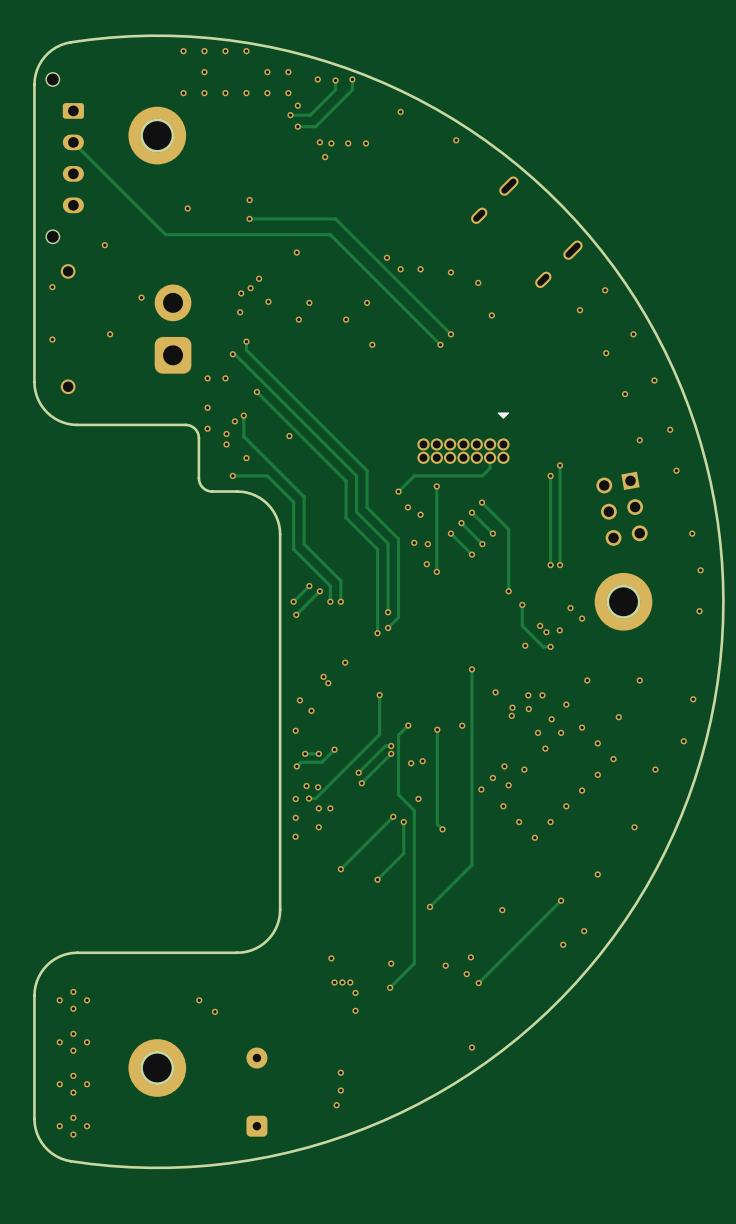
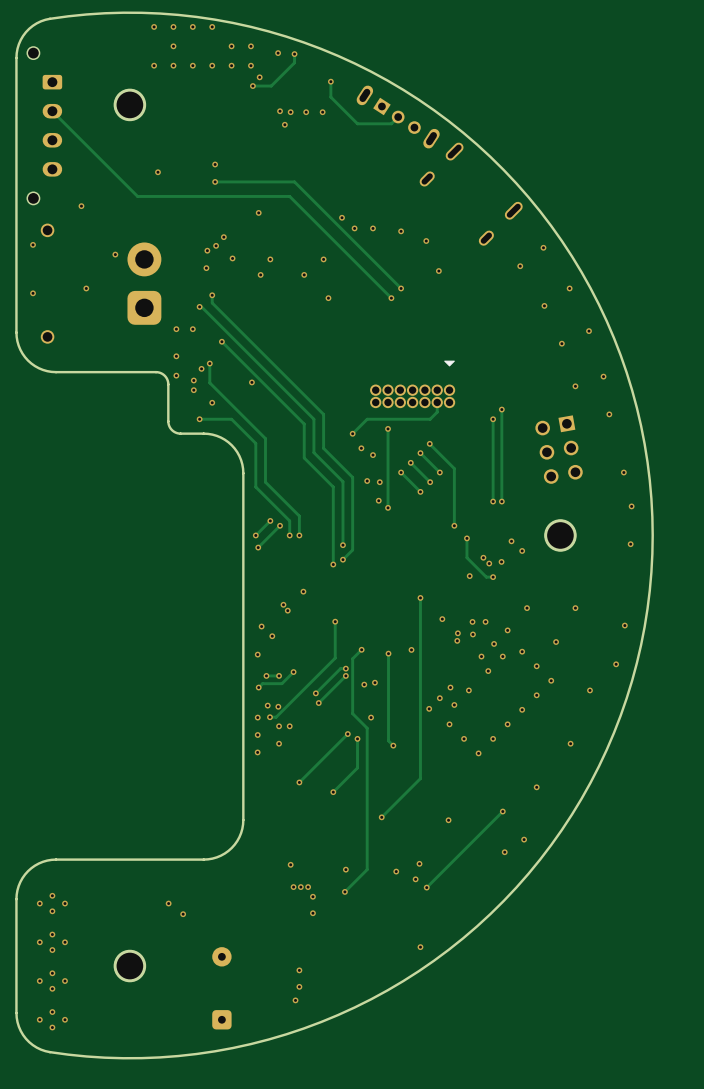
track: (352, 79) (352, 89) (315, 126) (297, 126) -> none
via: (352, 79) -> none
part footprint: [128, 106, 187, 165] -> [114, 89, 146, 121]
track: none -> (330, 81) (330, 97) (357, 123) (391, 123) (398, 117)
via: none -> (330, 81)
via: (400, 111) -> none
via: (297, 126) -> none
via: (456, 140) -> none
part: none -> (398, 117)
part footprint: [594, 572, 653, 631] -> [544, 519, 576, 551]
part footprint: [128, 1039, 187, 1097] -> [114, 950, 146, 982]

